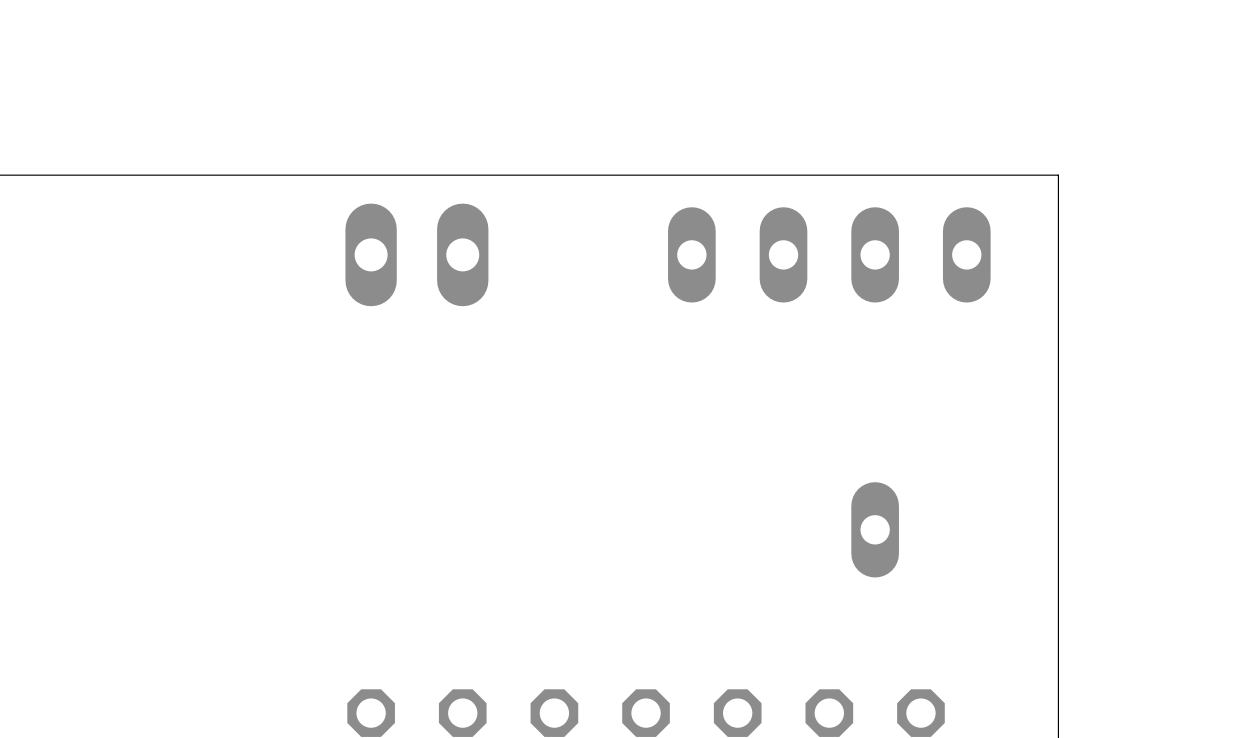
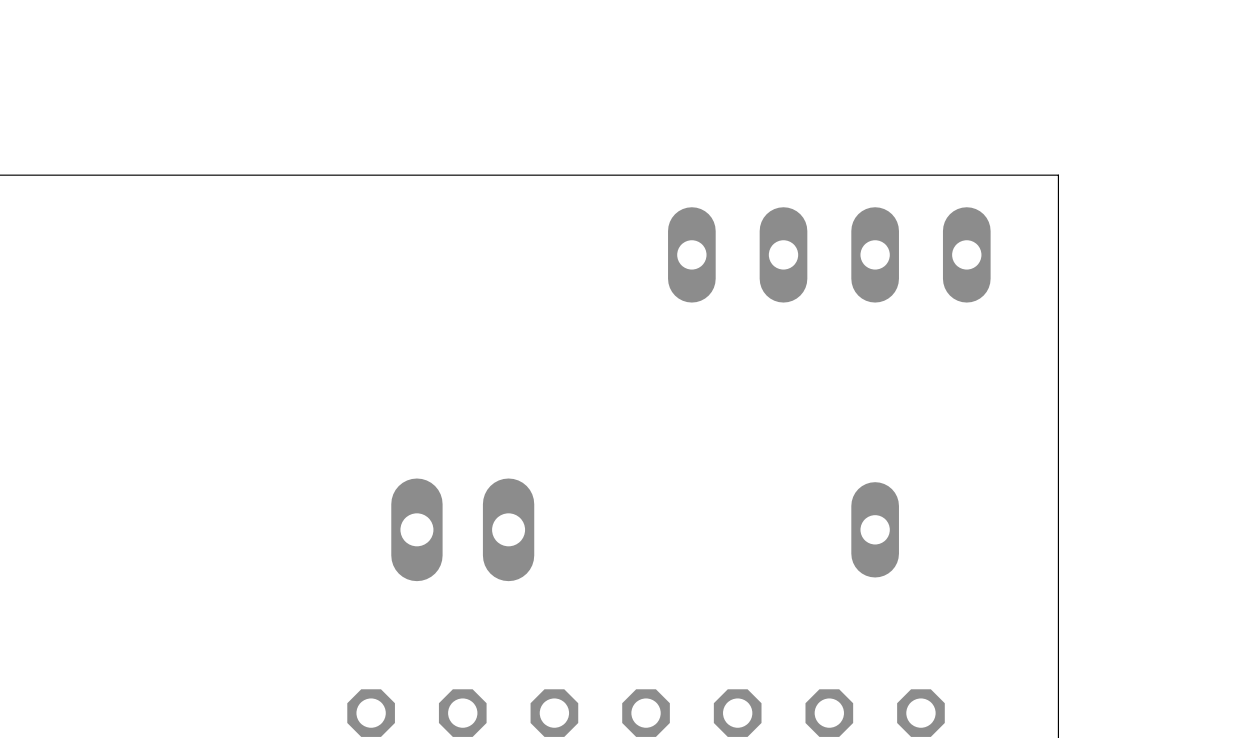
part position: (416, 254) -> (462, 529)

